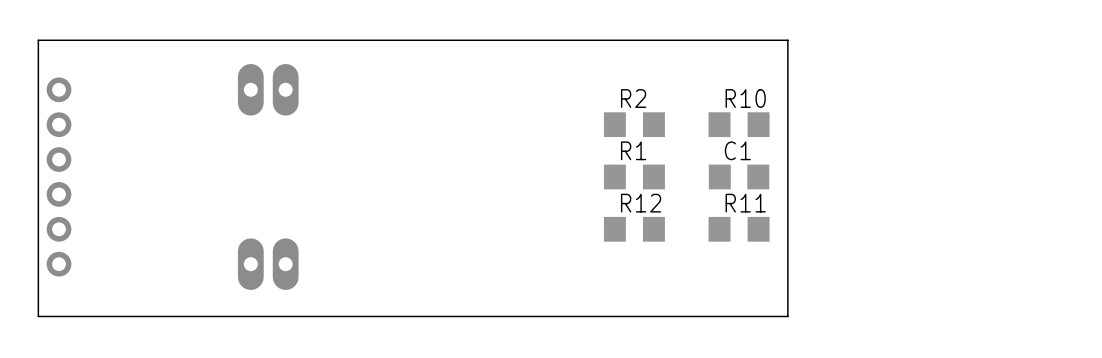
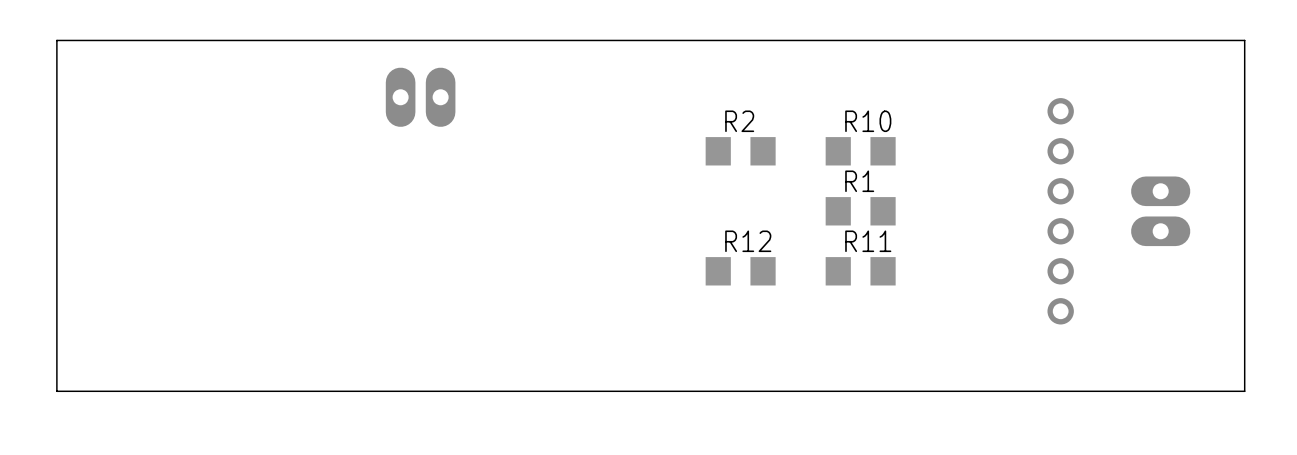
board edge: (38, 40) (787, 40) (787, 316) (38, 316) -> (56, 54) (56, 40) (1244, 40) (1244, 391) (56, 391) (56, 371)
part position: (268, 89) -> (420, 97)
part: (59, 176) -> none
R1 position: (634, 176) -> (860, 211)
C1: (739, 176) -> none
part: none -> (1060, 211)
part: none -> (1160, 211)
part: (268, 264) -> none

